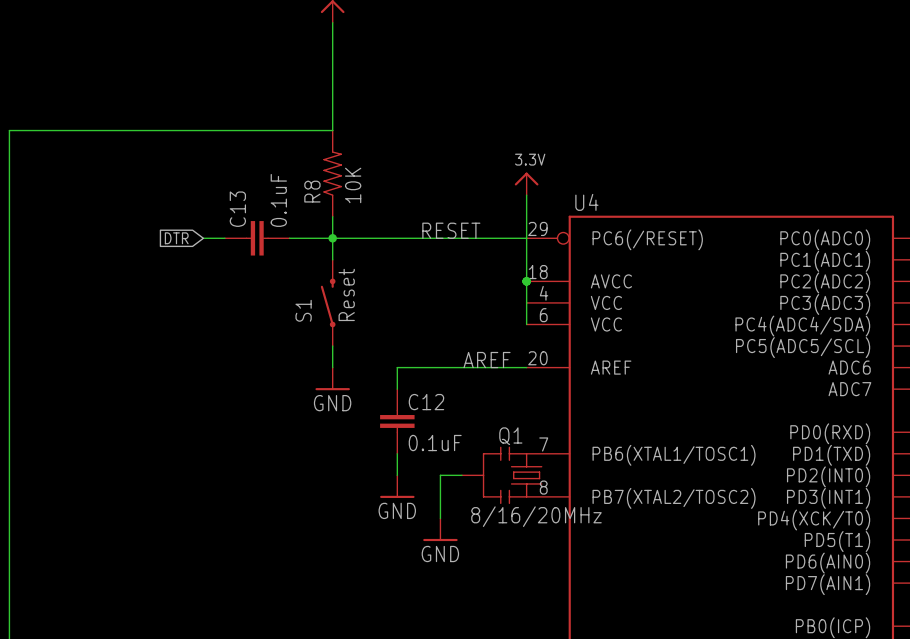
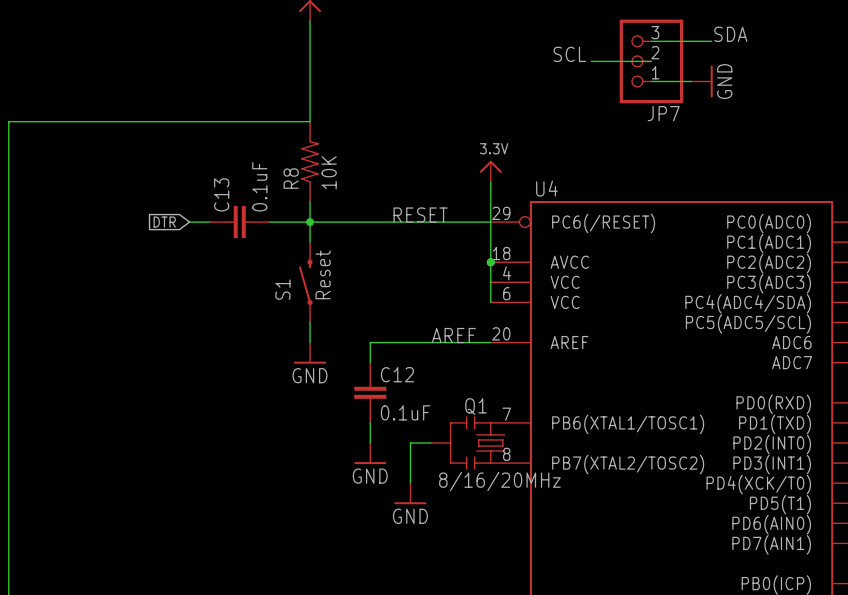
label: none -> SDA (730, 34)
wire: none -> (651, 41) (711, 41)
label: none -> SCL (569, 54)
wire: none -> (591, 61) (651, 61)
JP7: none -> (651, 61)
wire: none -> (651, 81) (691, 81)
power symbol: none -> GND (702, 81)

